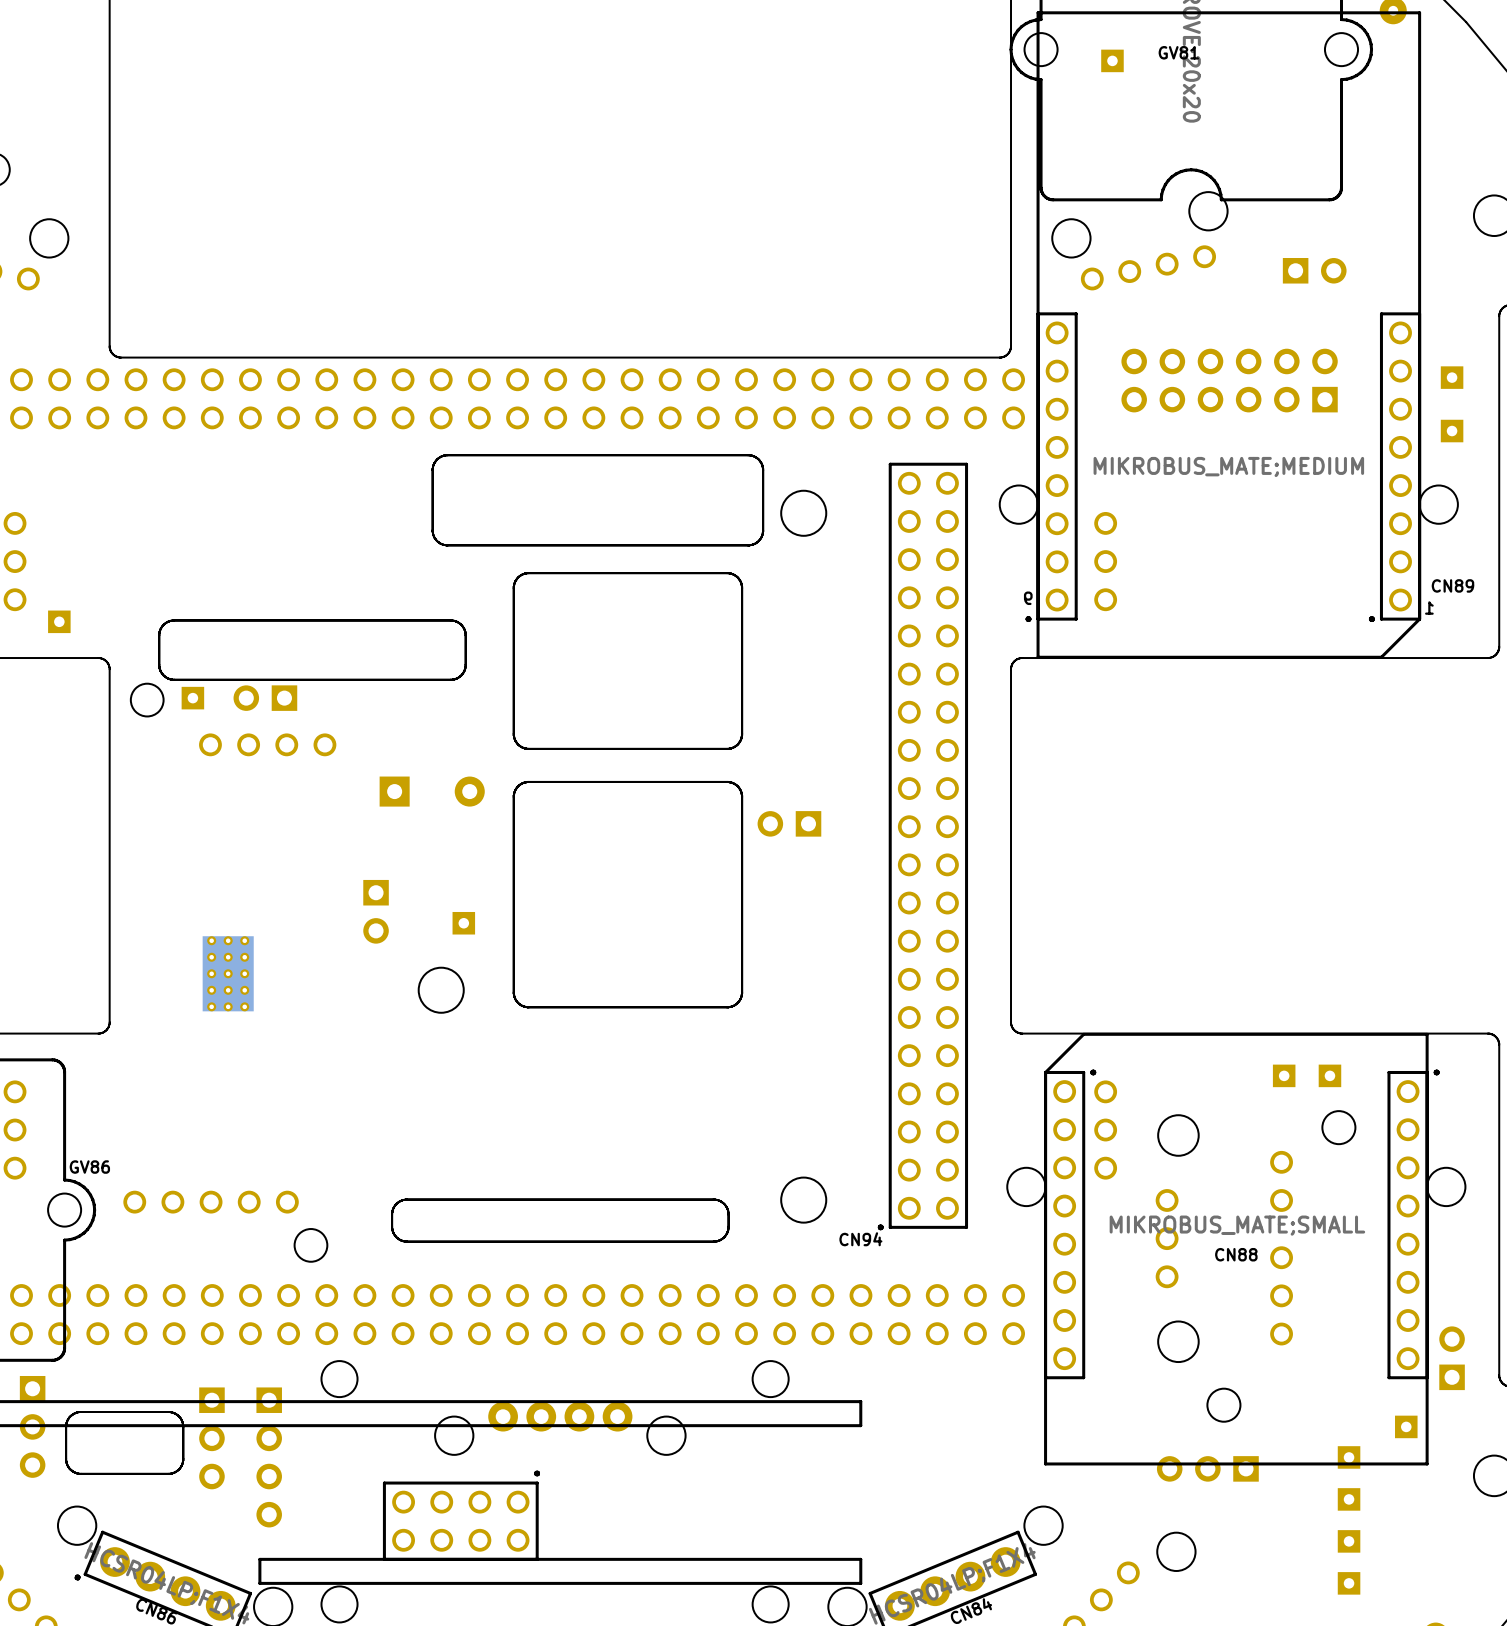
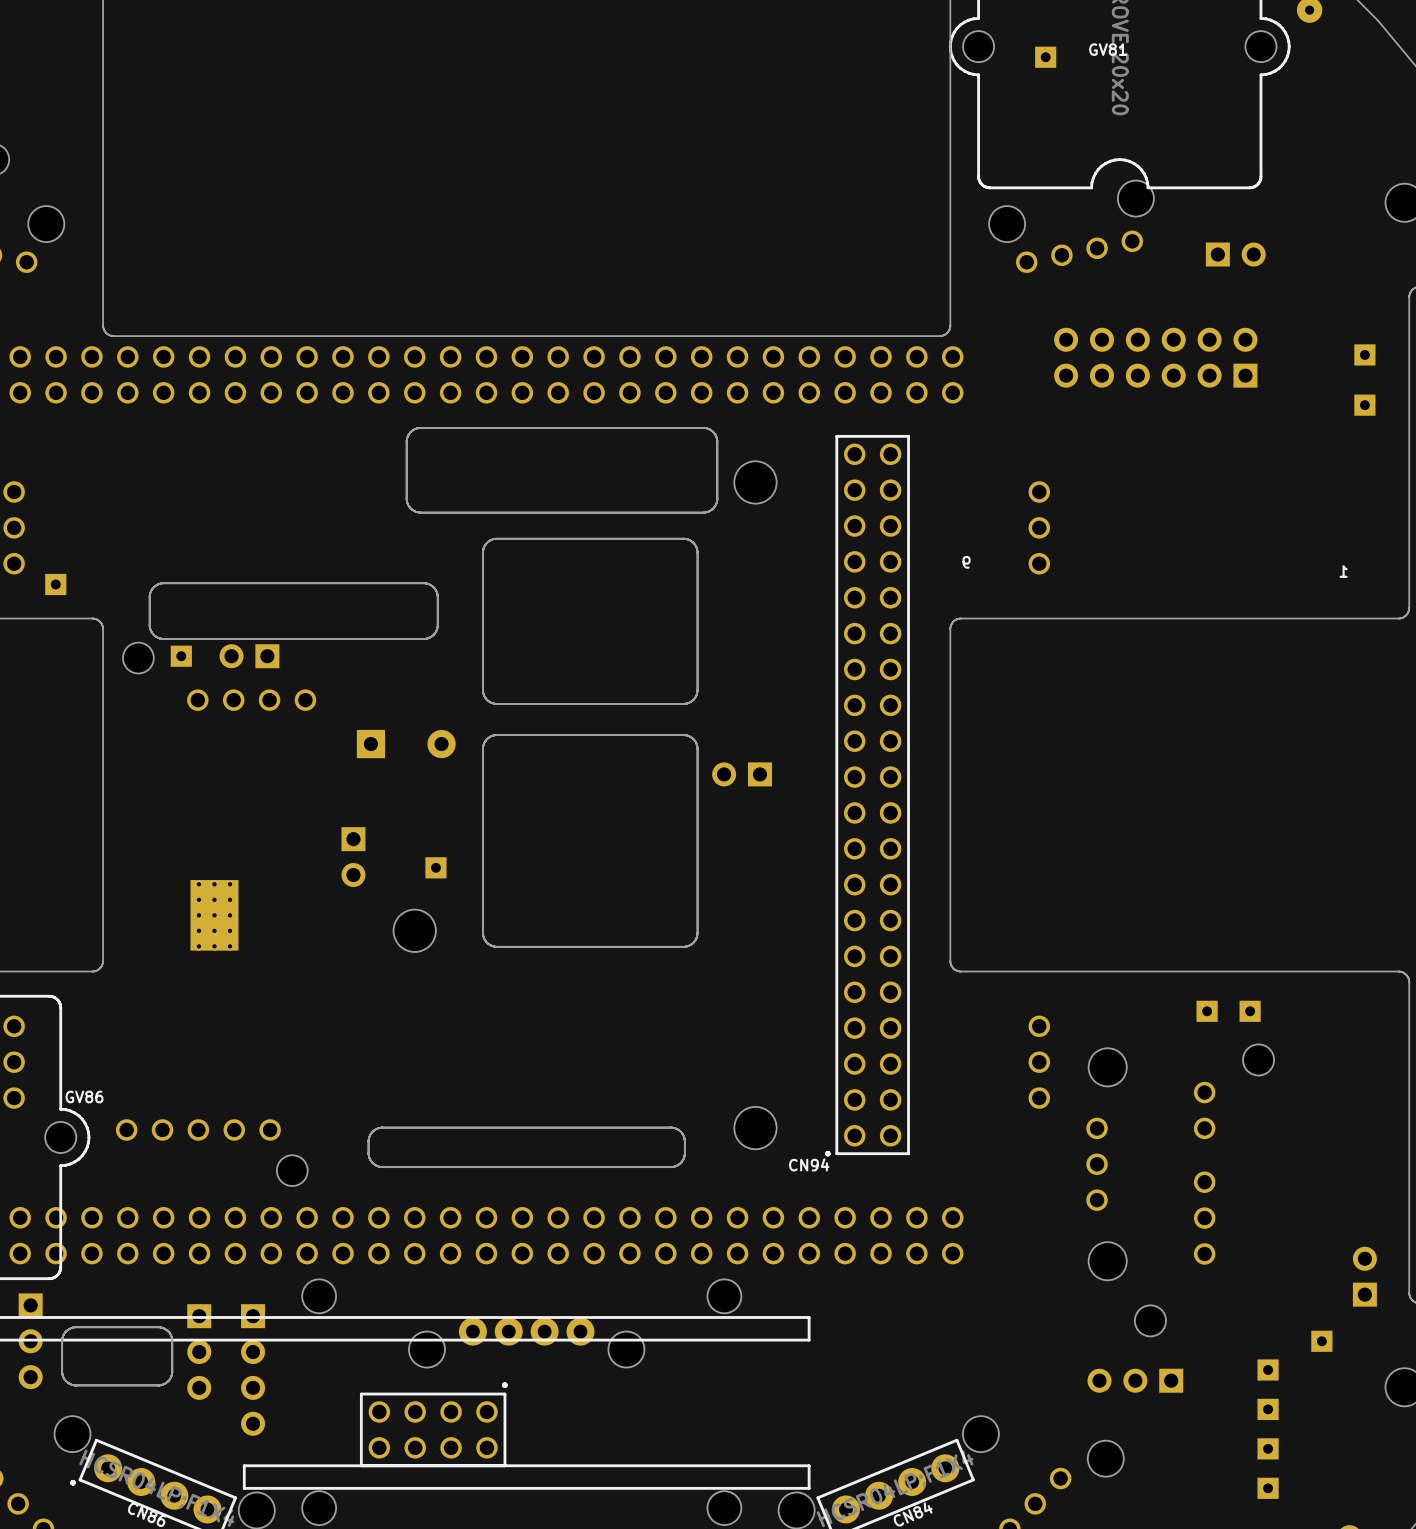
CN89: MIKROBUS_MATE;MEDIUM (1228, 335) -> none
CN88: MIKROBUS_MATE;SMALL (1236, 1249) -> none

